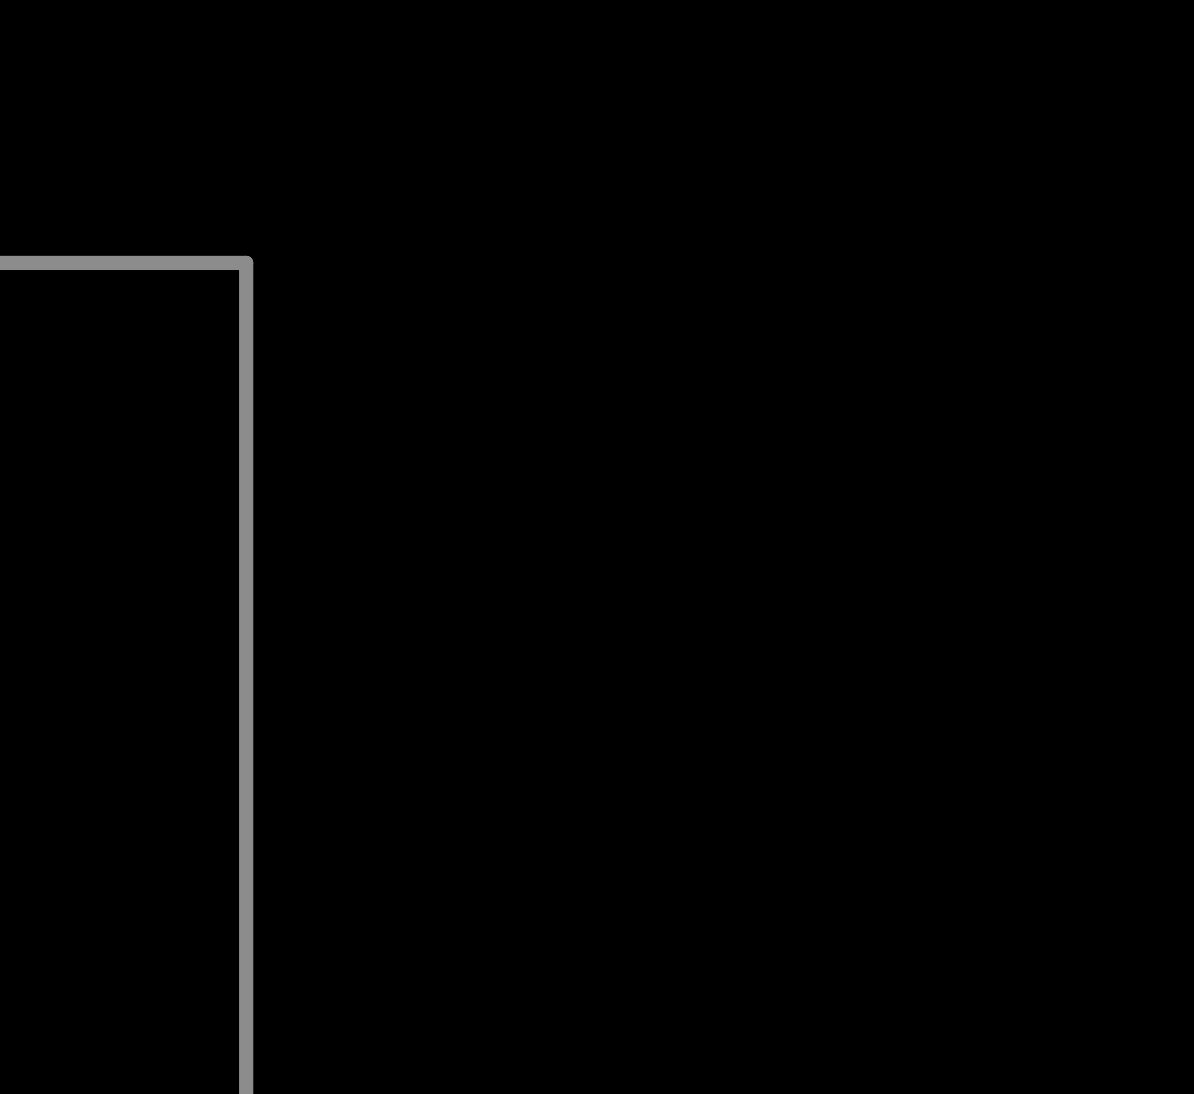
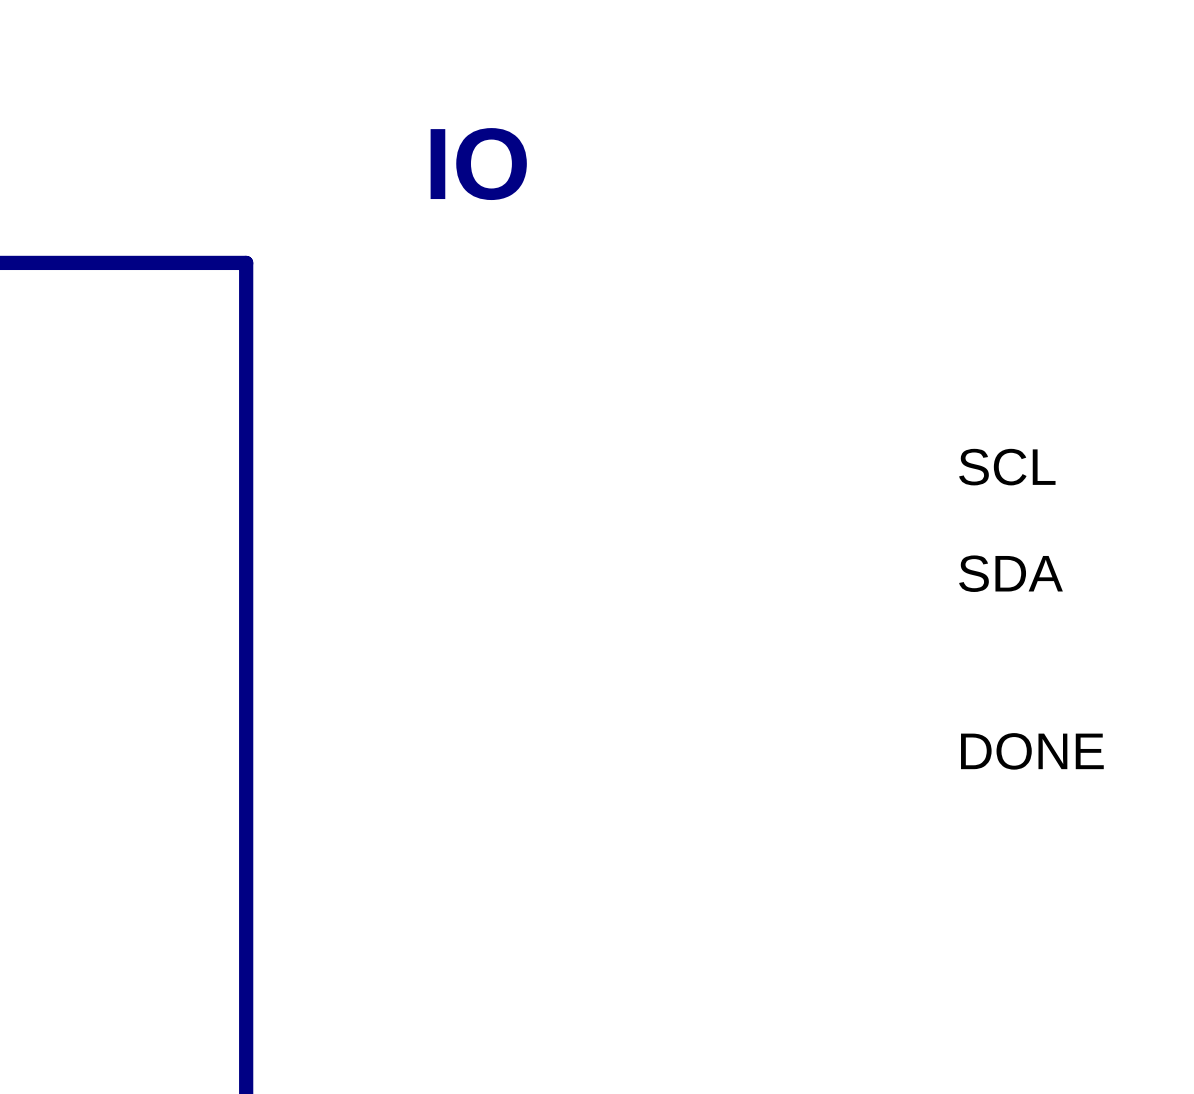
text: none -> IO (478, 164)
label: none -> SCL (1007, 467)
label: none -> SDA (1011, 573)
label: none -> DONE (1032, 751)

